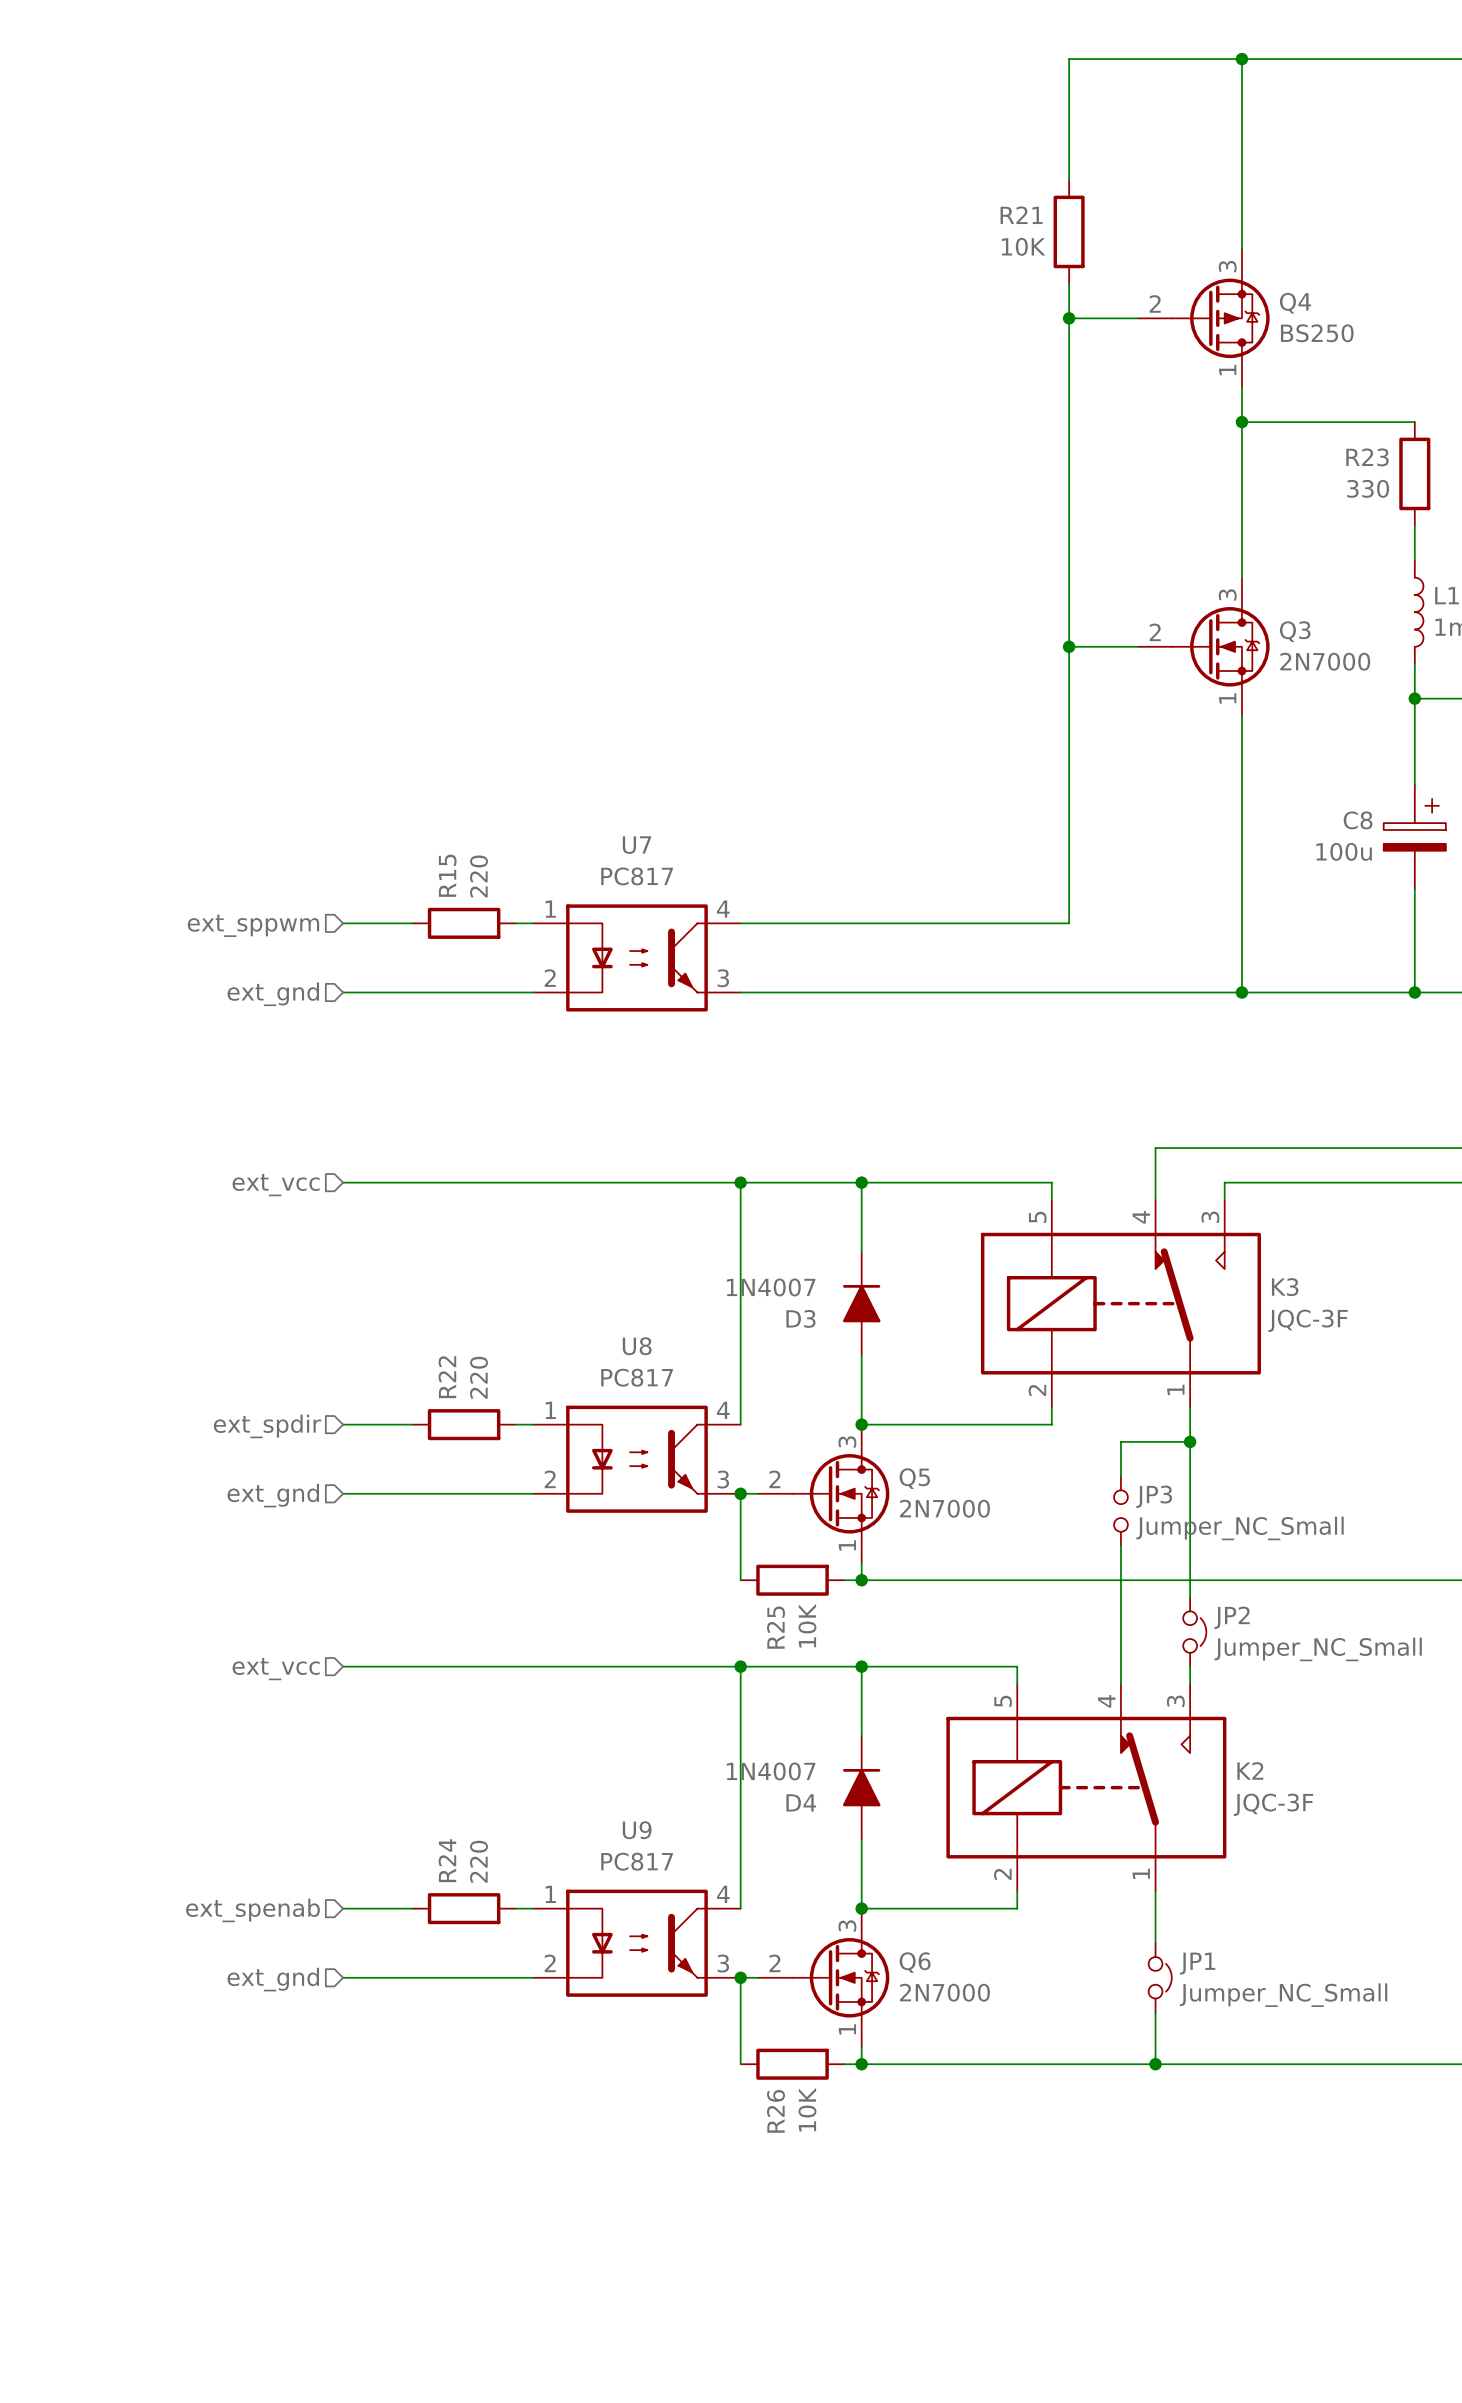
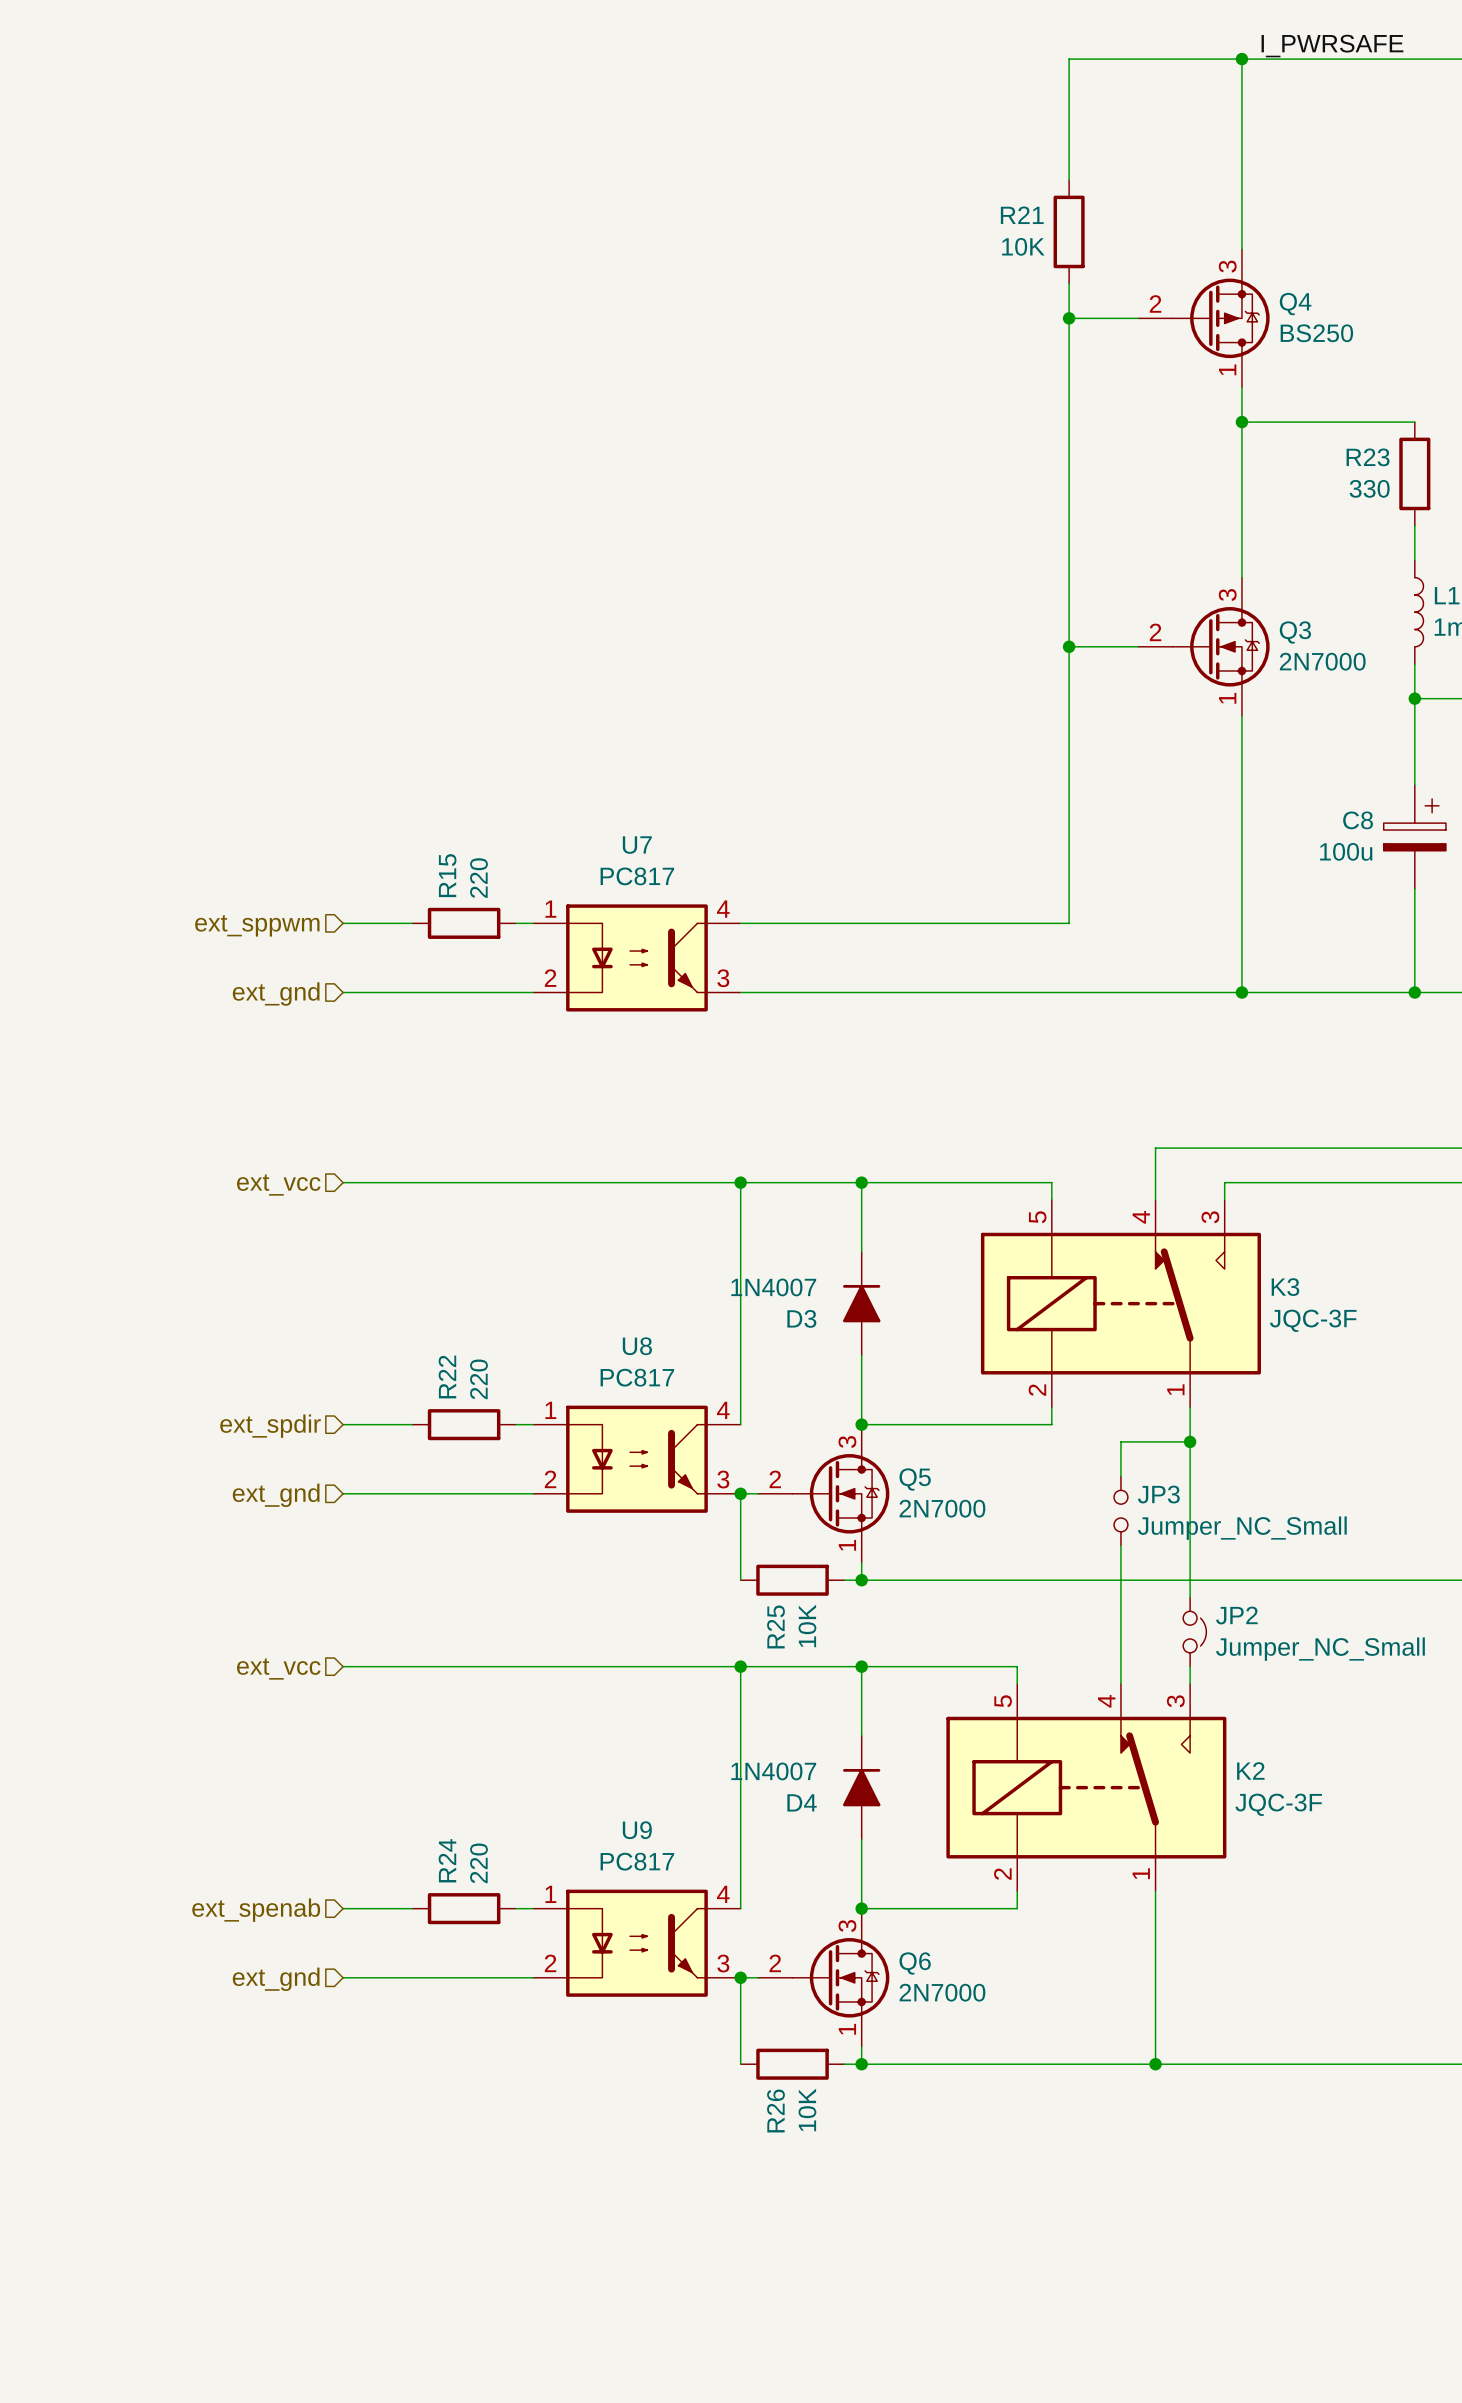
label: none -> I_PWRSAFE (1332, 46)
wire: none -> (1155, 1943) (1155, 2012)
JP1: Jumper_NC_Small (1160, 1977) -> none

